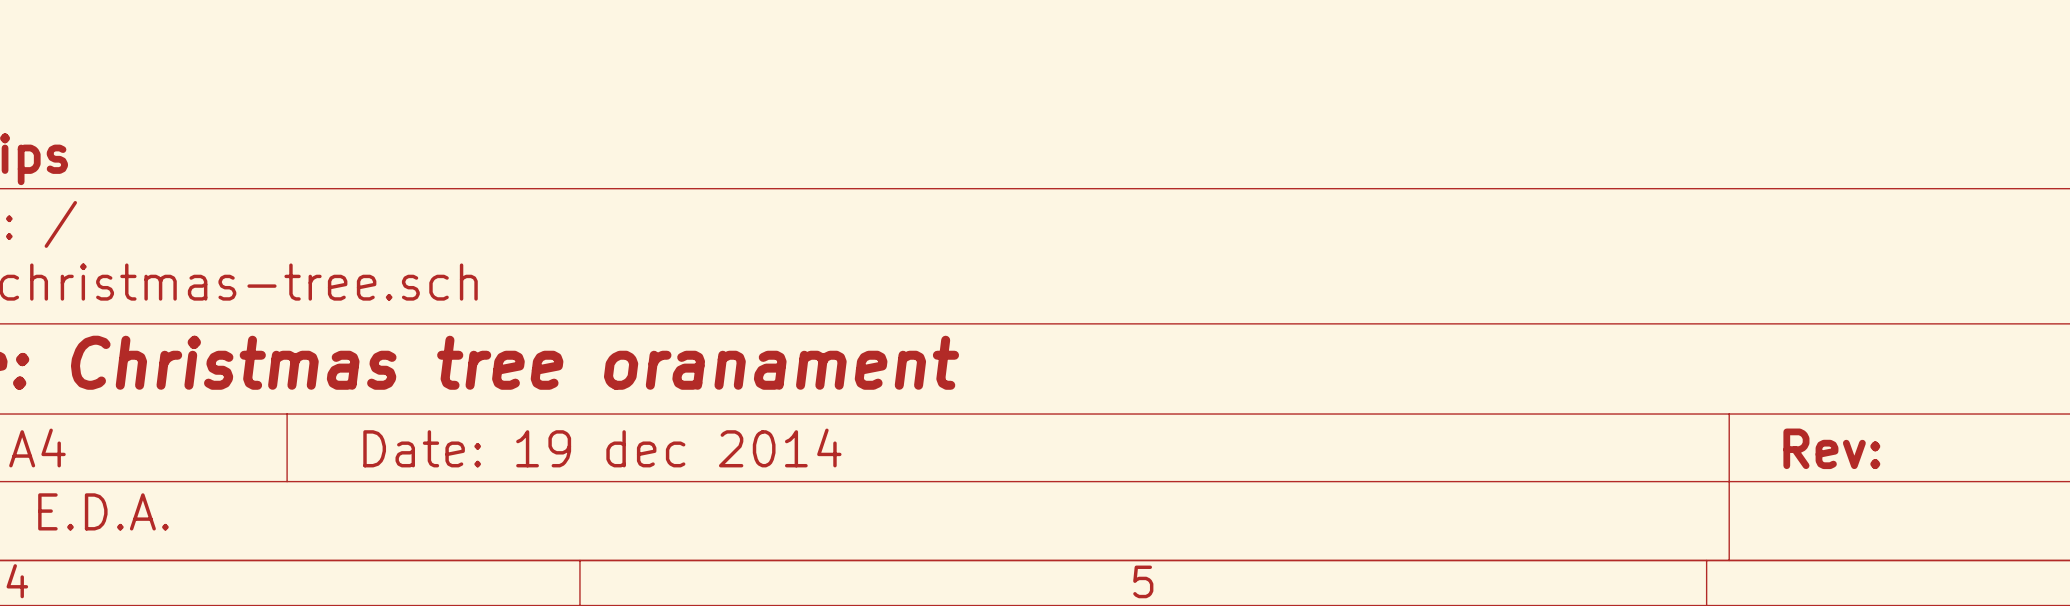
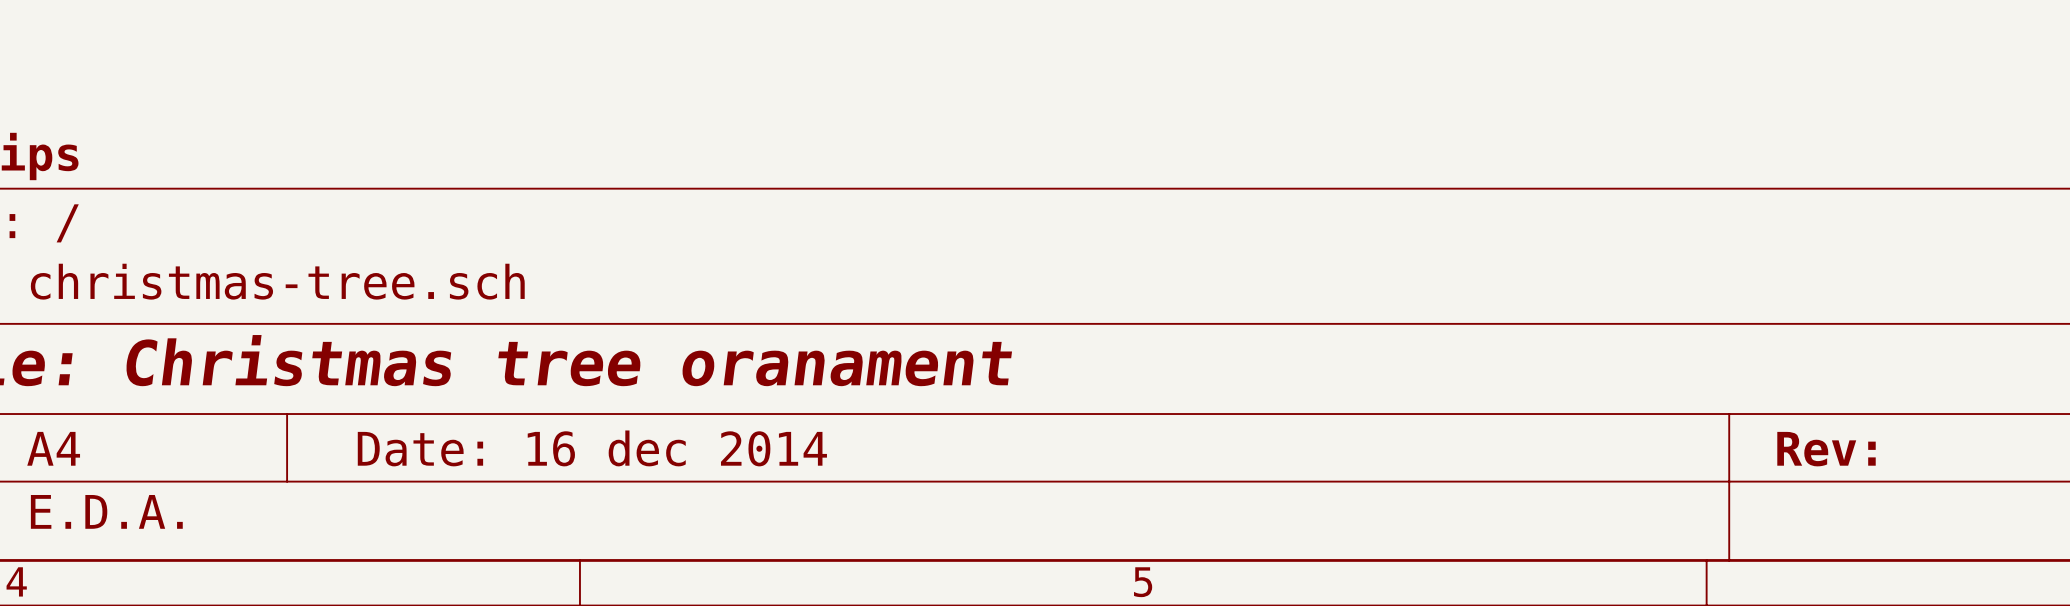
title block: Date: 19 dec 2014 (602, 447) -> Date: 16 dec 2014 (592, 448)

